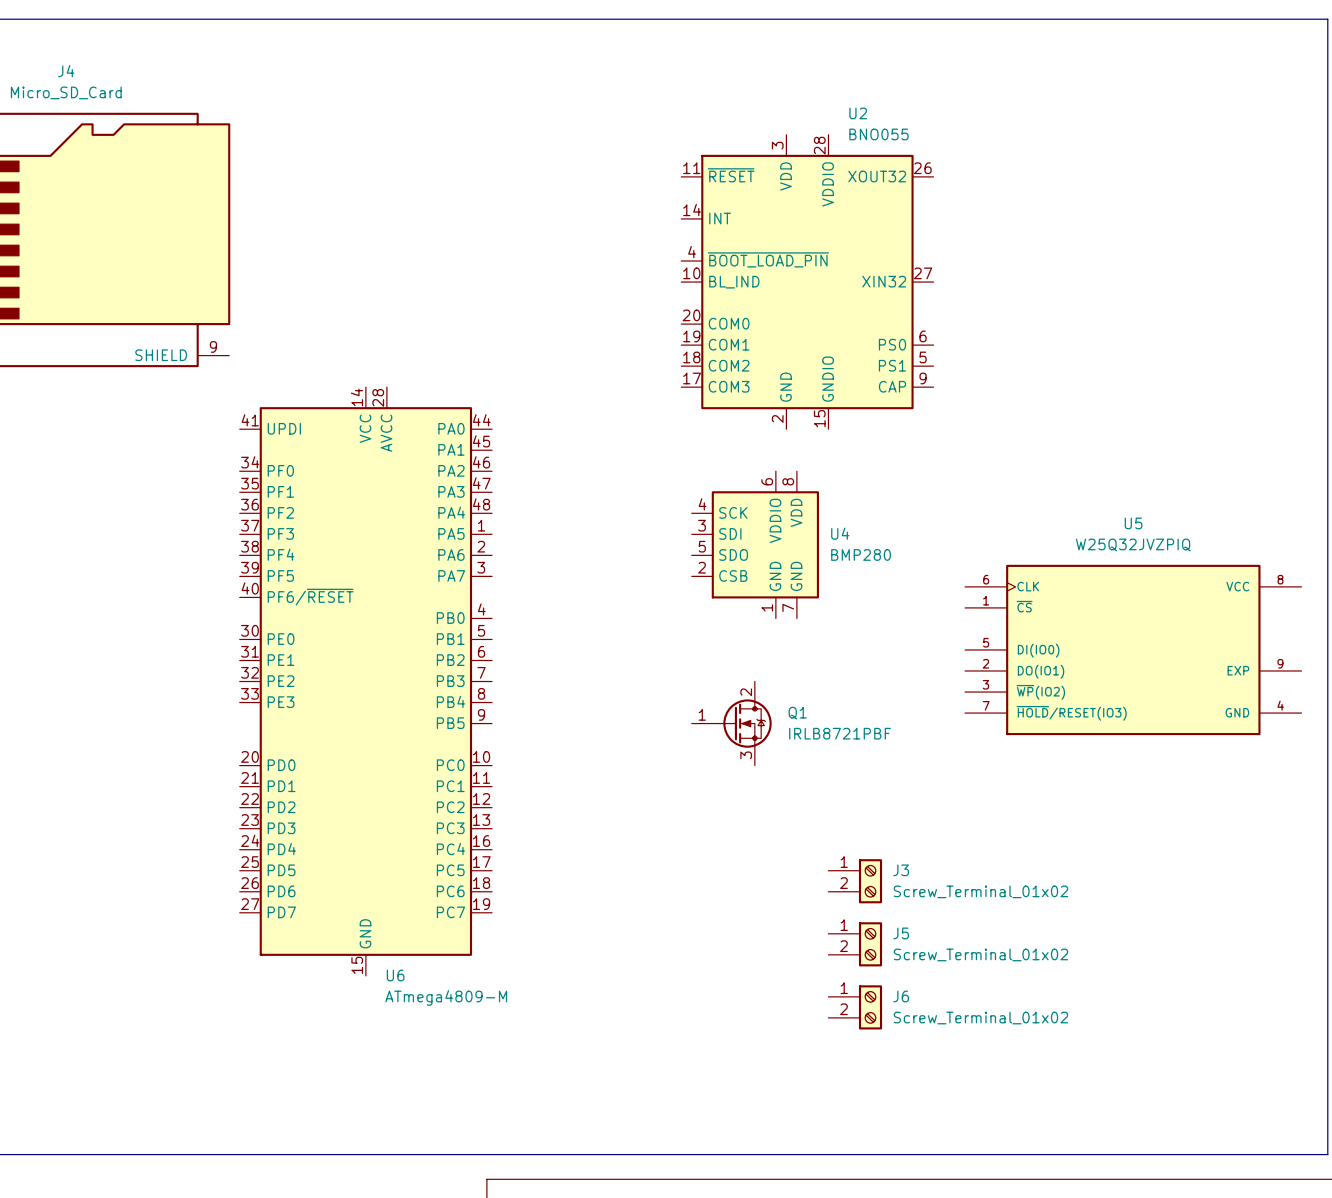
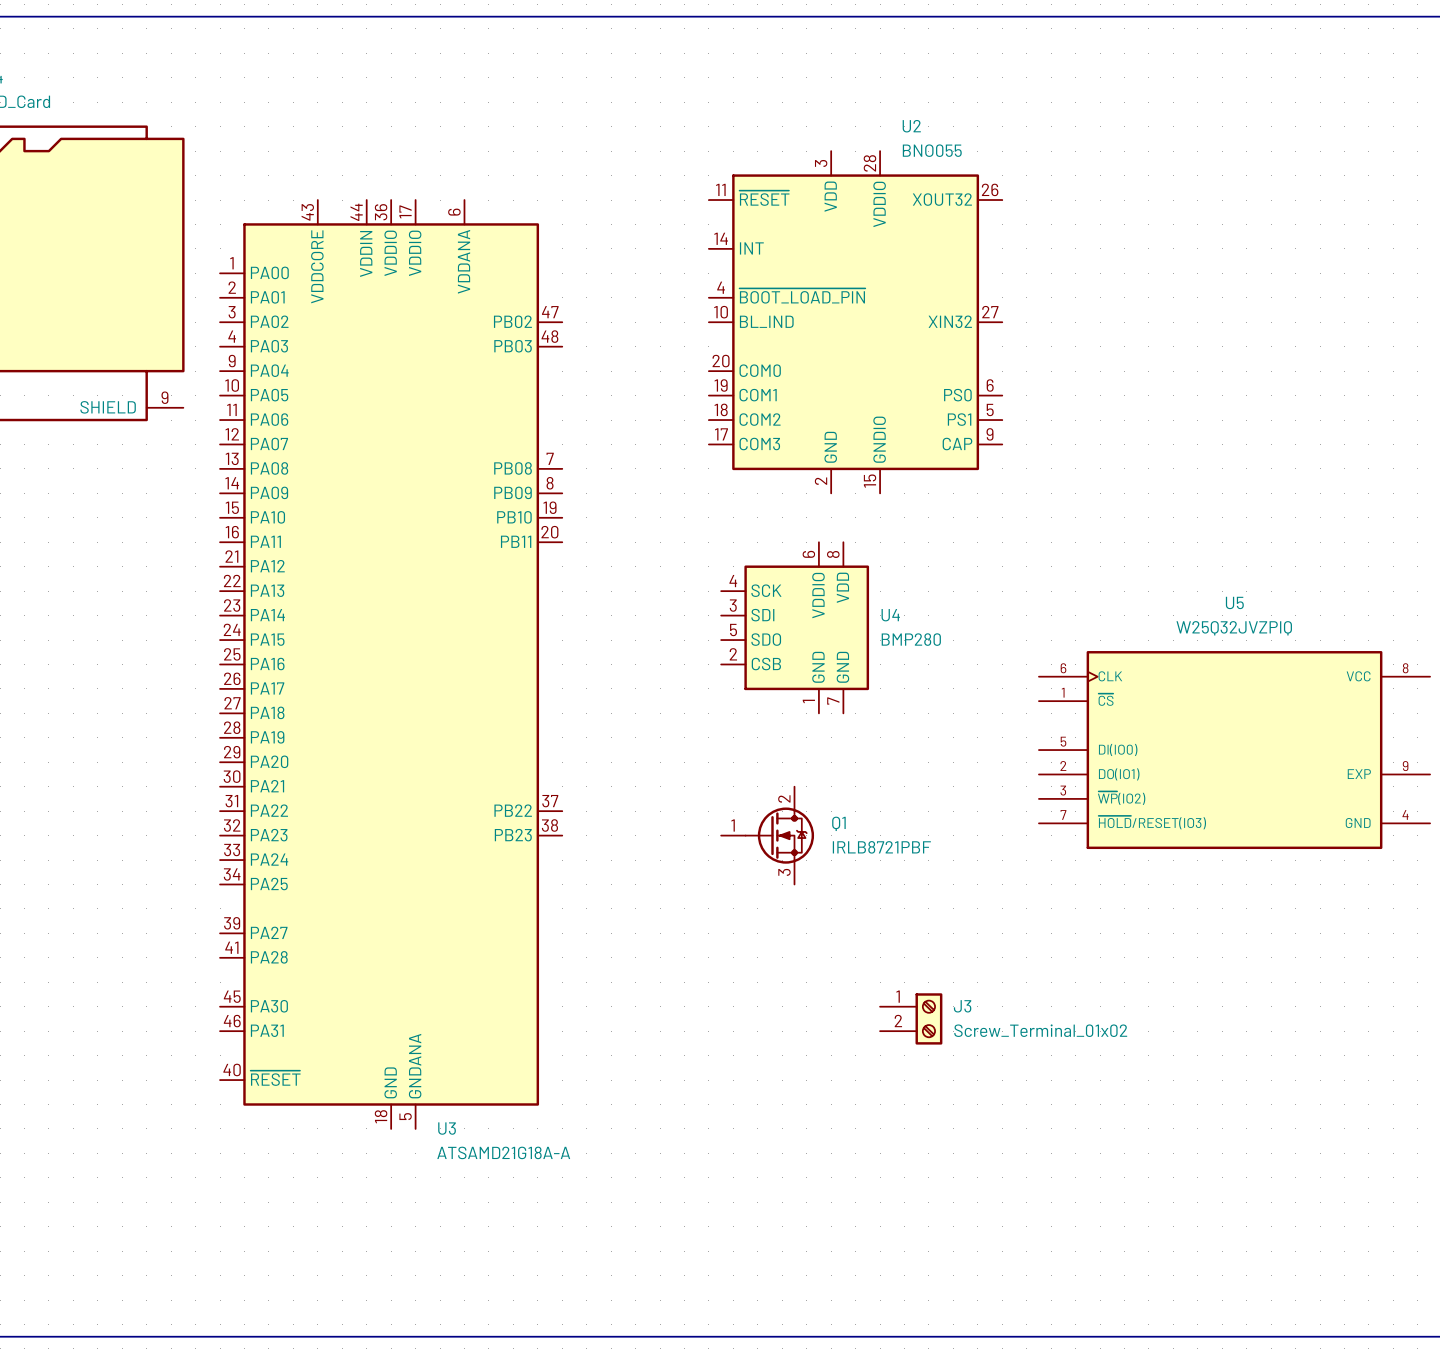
U3: none -> ATSAMD21G18A-A (391, 664)
U6: ATmega4809-M (365, 681) -> none
J5: Screw_Terminal_01x02 (855, 944) -> none
J6: Screw_Terminal_01x02 (855, 1007) -> none

